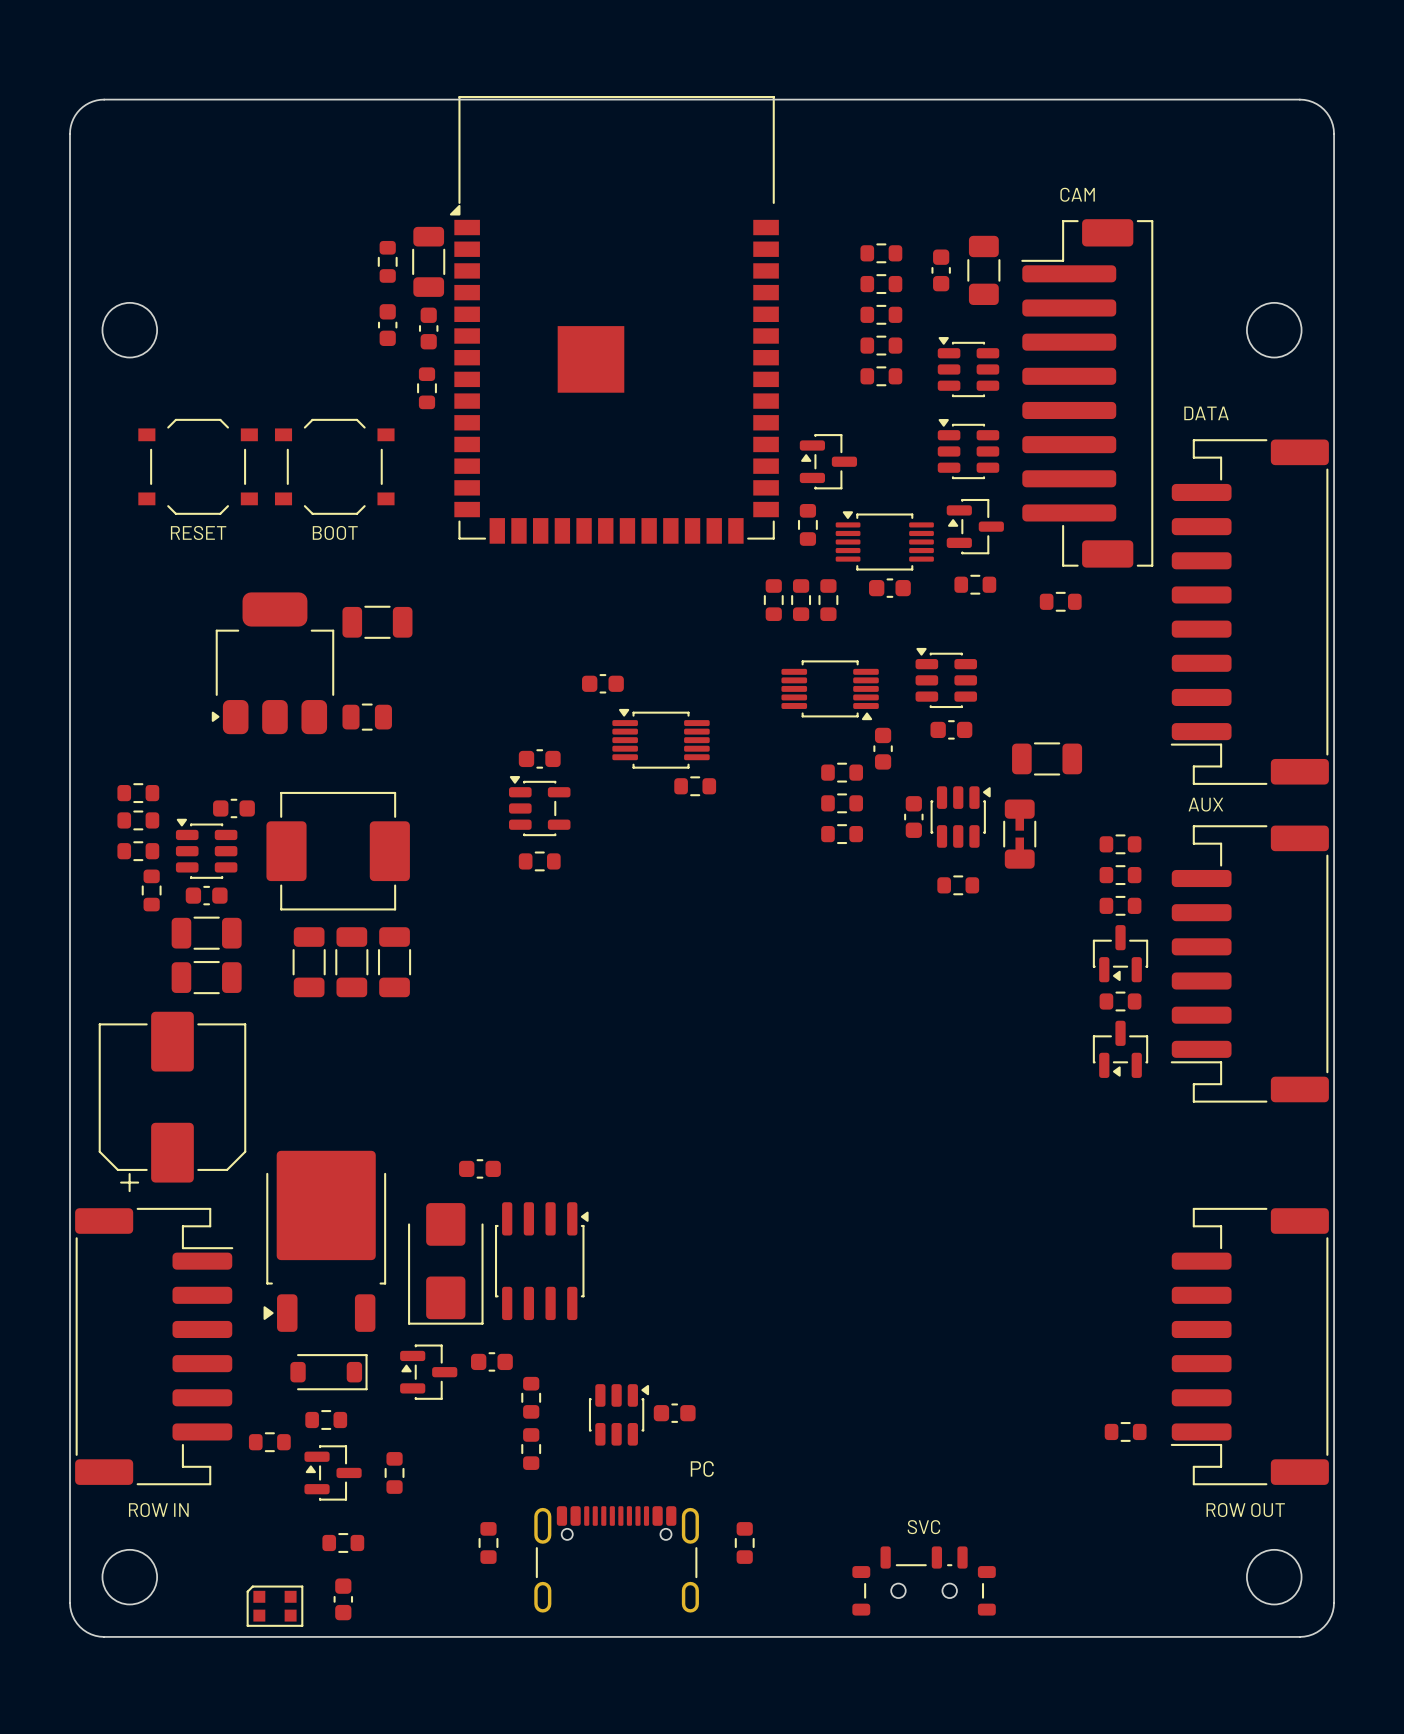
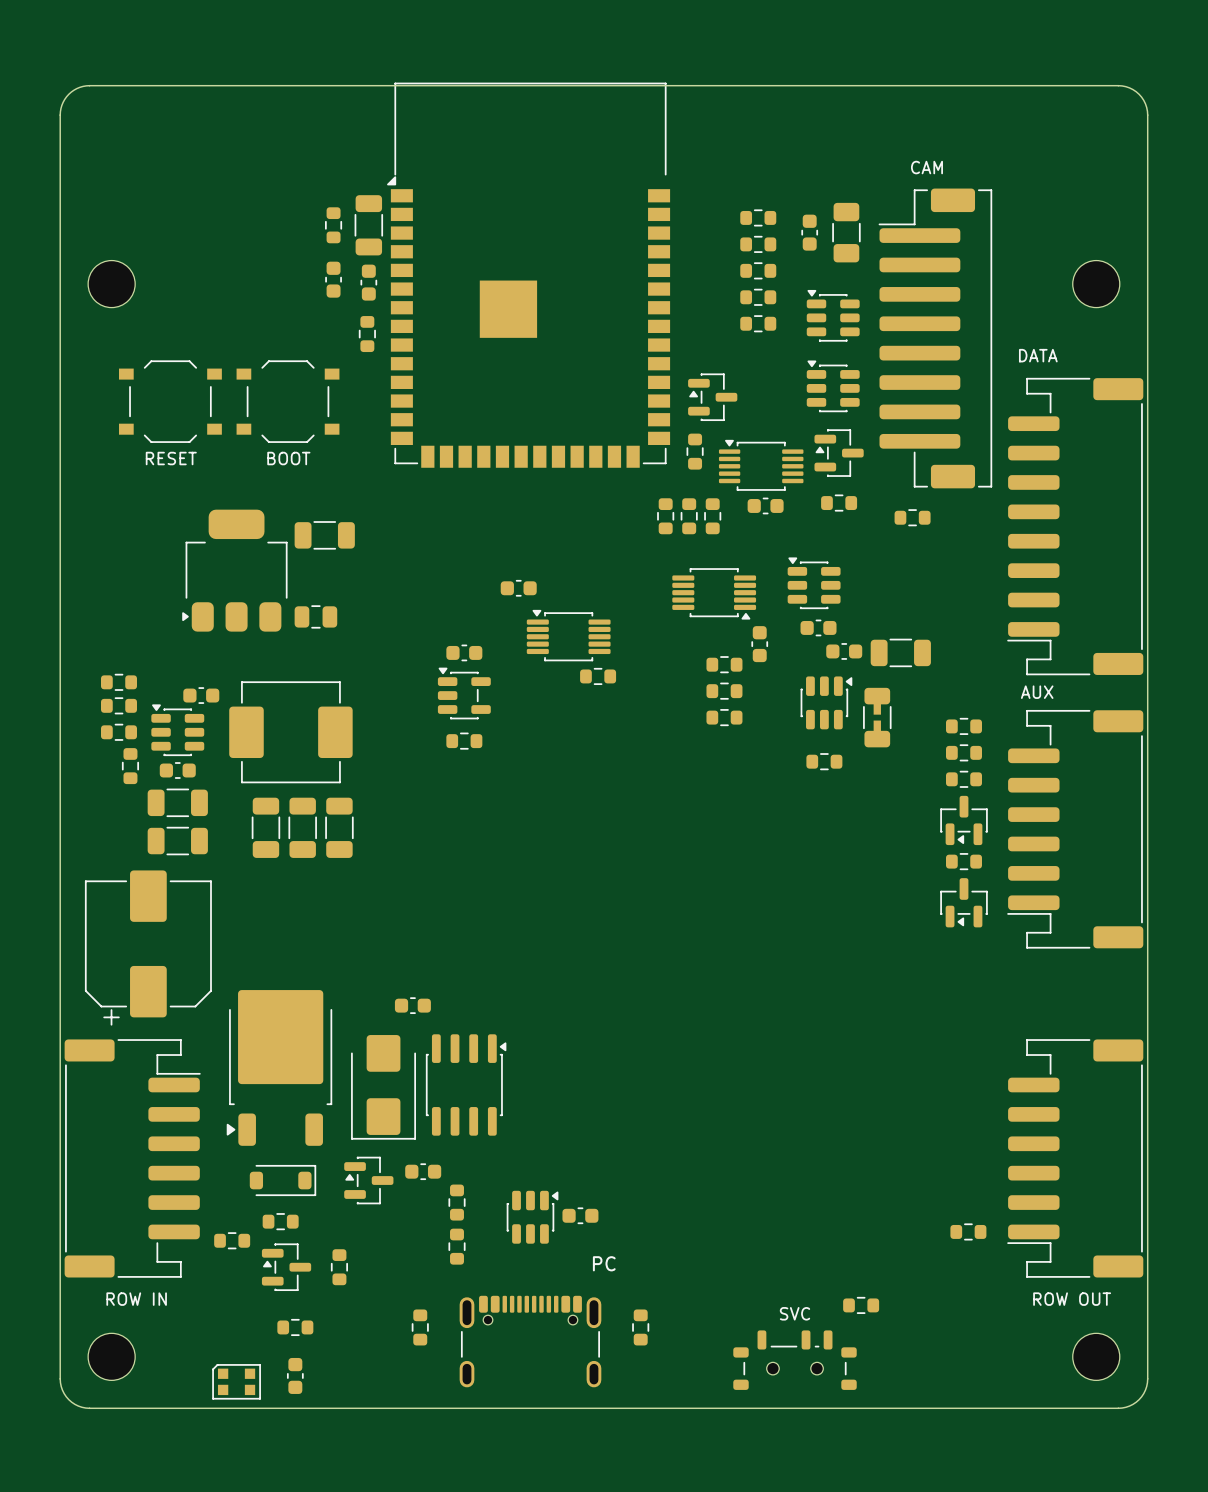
part rotation: 0° (913, 817) -> 90° clockwise (844, 651)
part position: (913, 817) -> (844, 651)
part: none -> (861, 1305)

